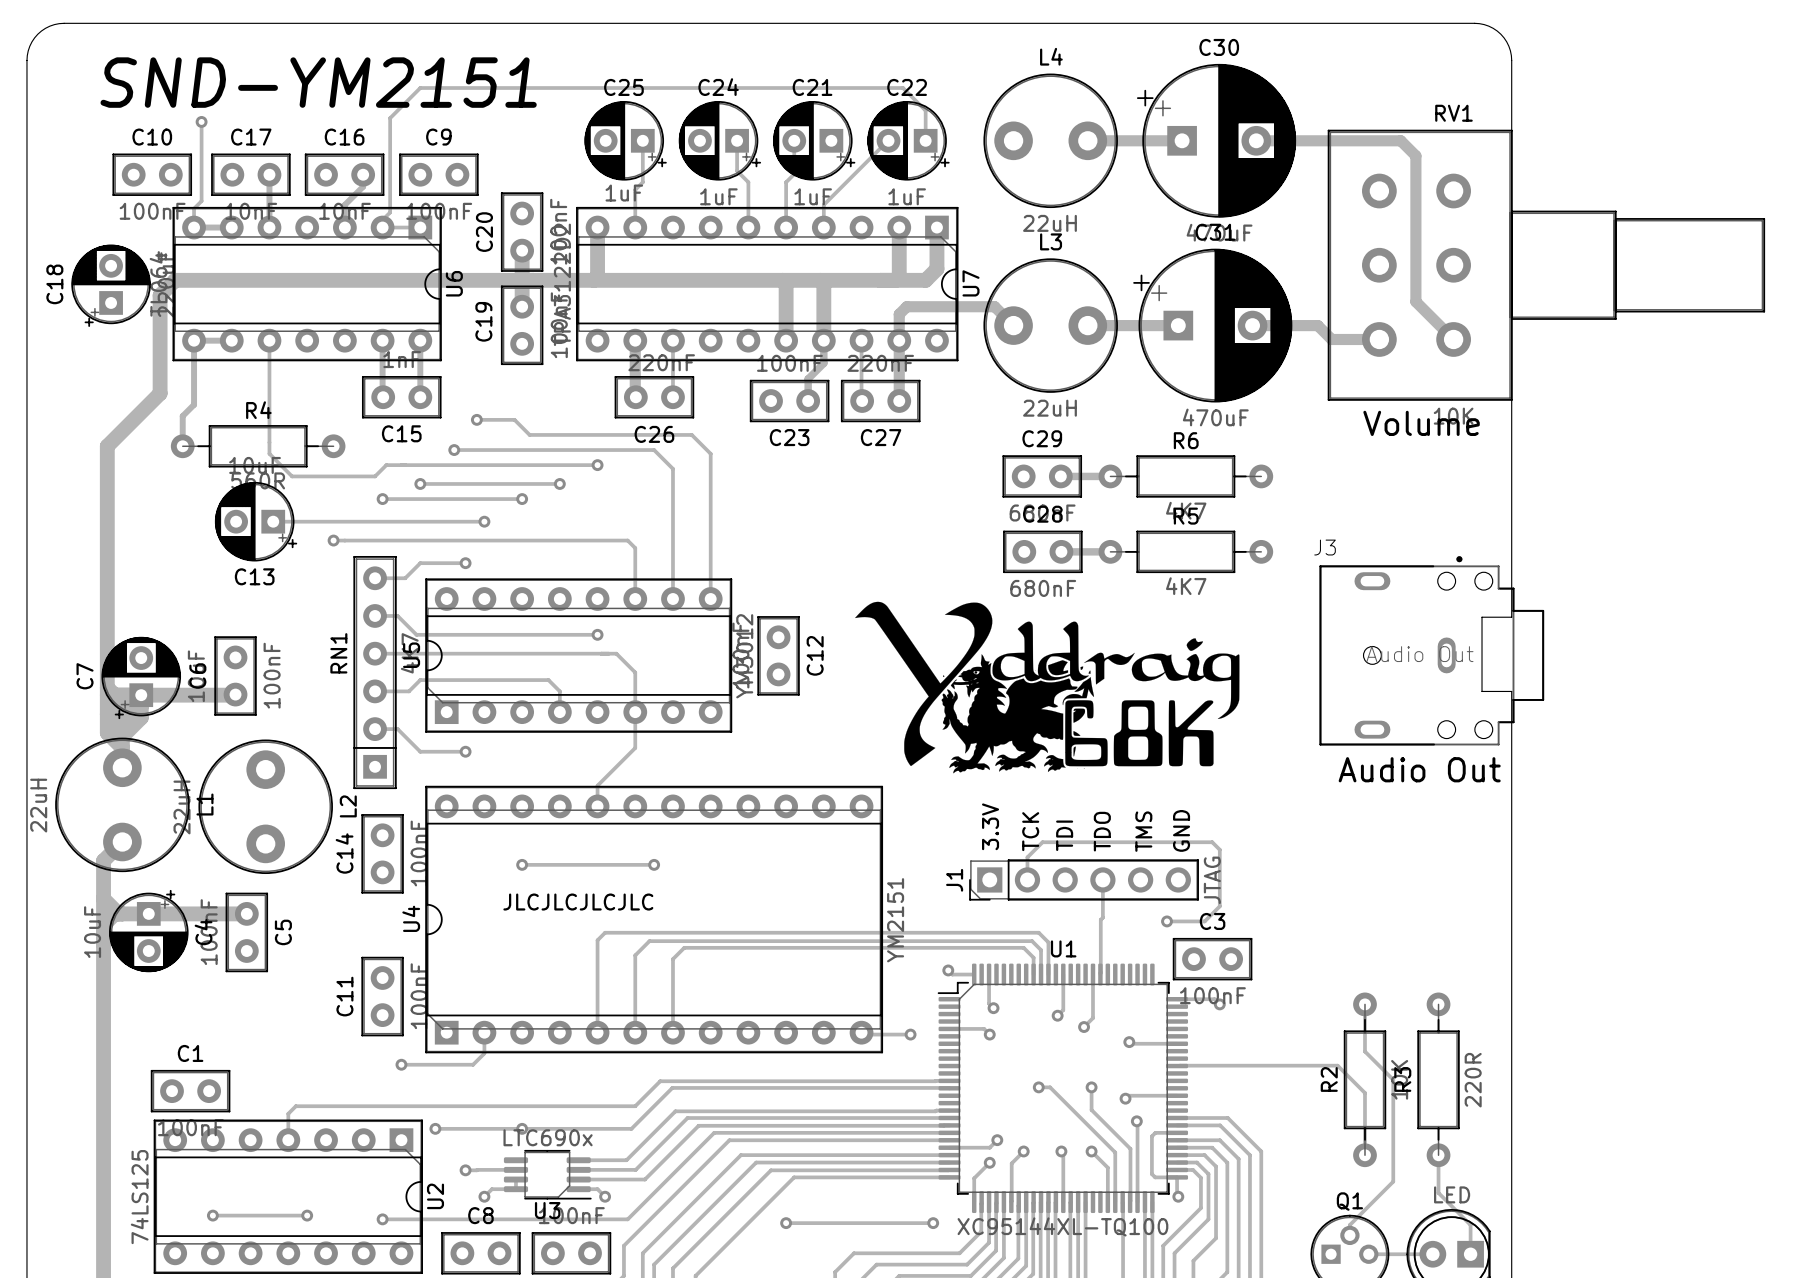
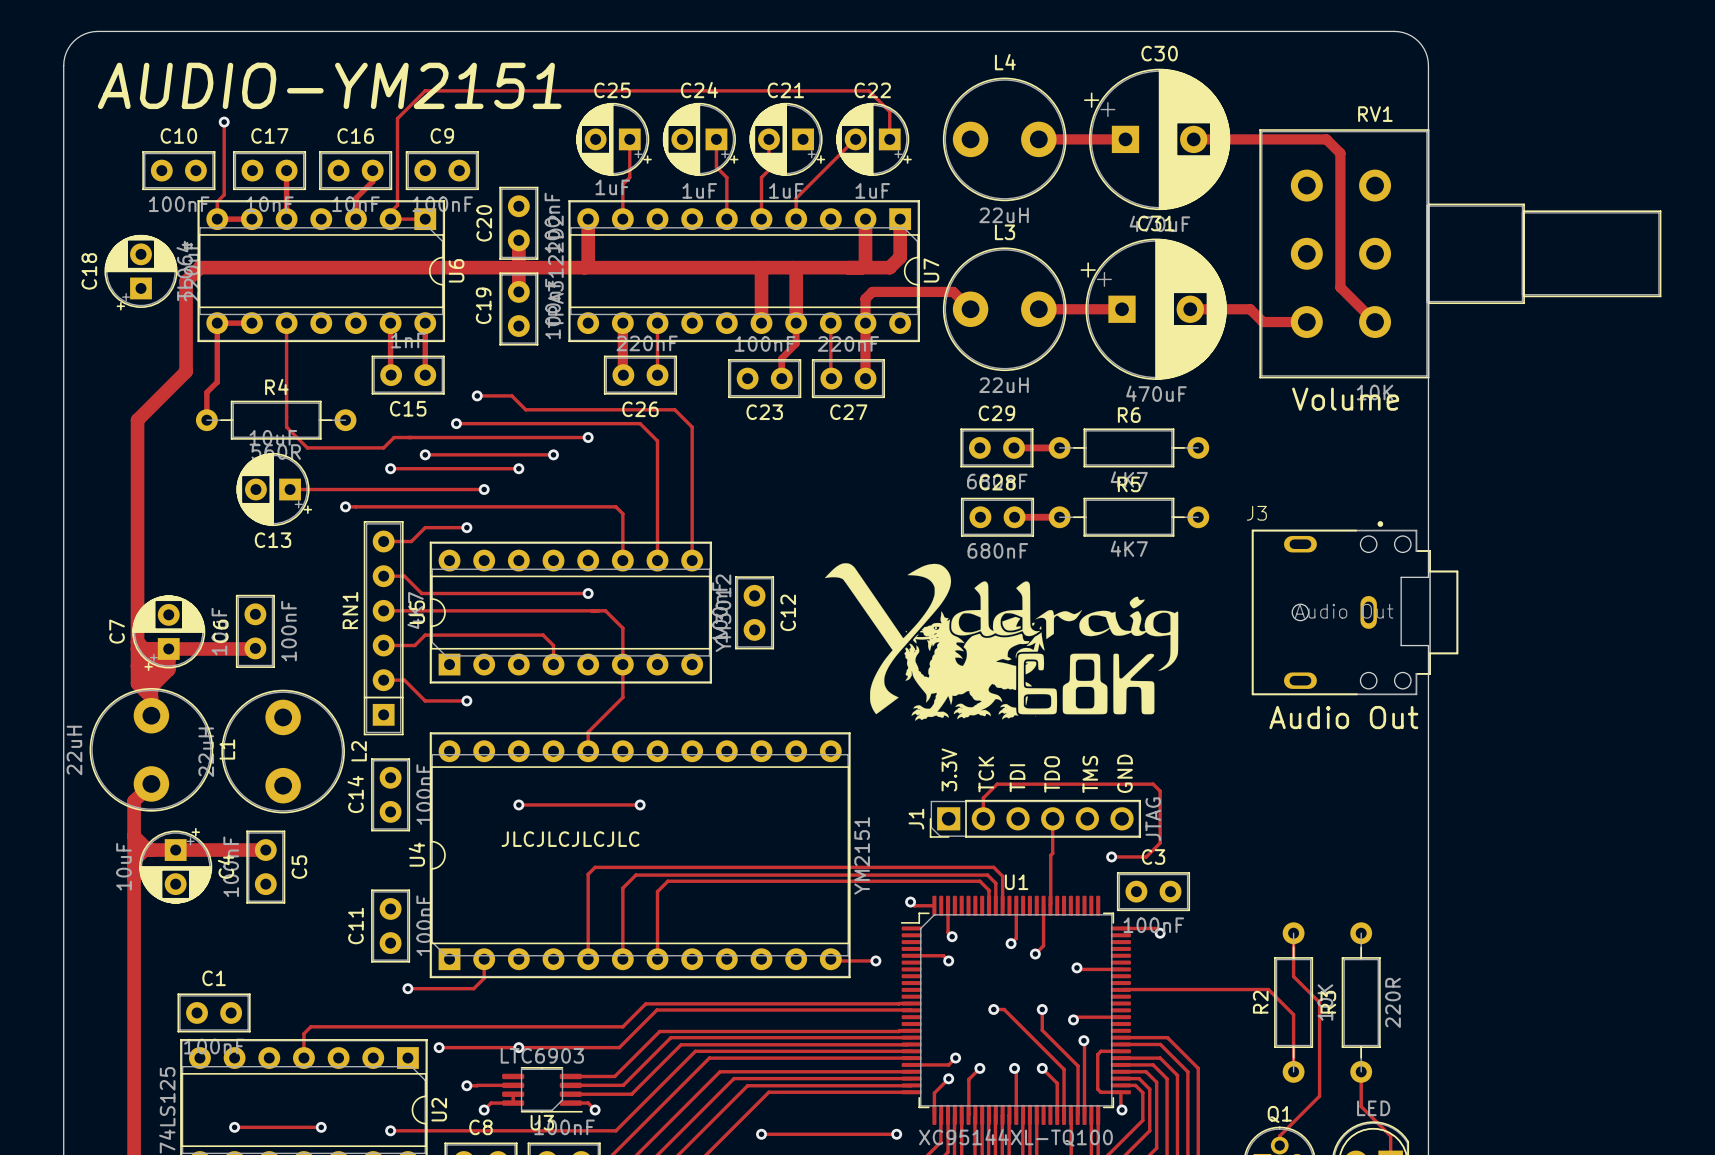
text: SND-YM2151 (318, 82) -> AUDIO-YM2151 (329, 85)
U3 value: LTC690x (548, 1137) -> LTC6903 (542, 1055)

